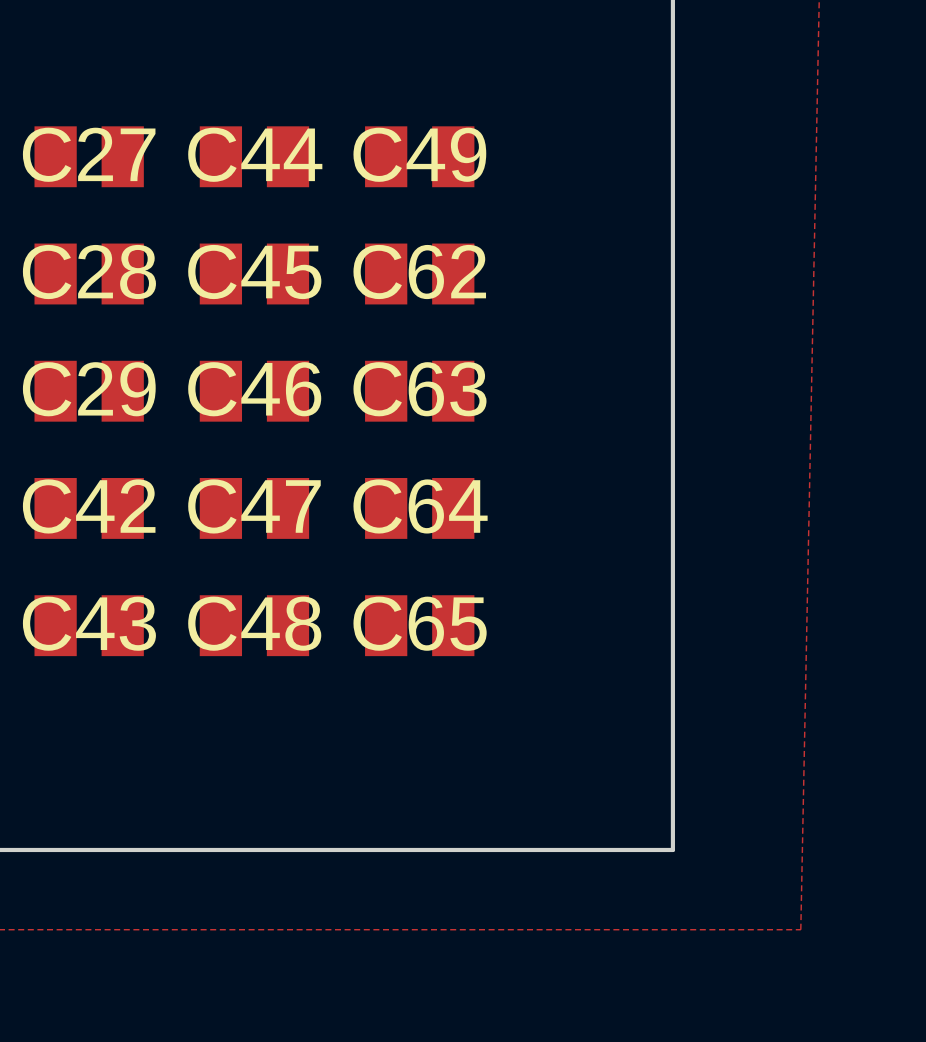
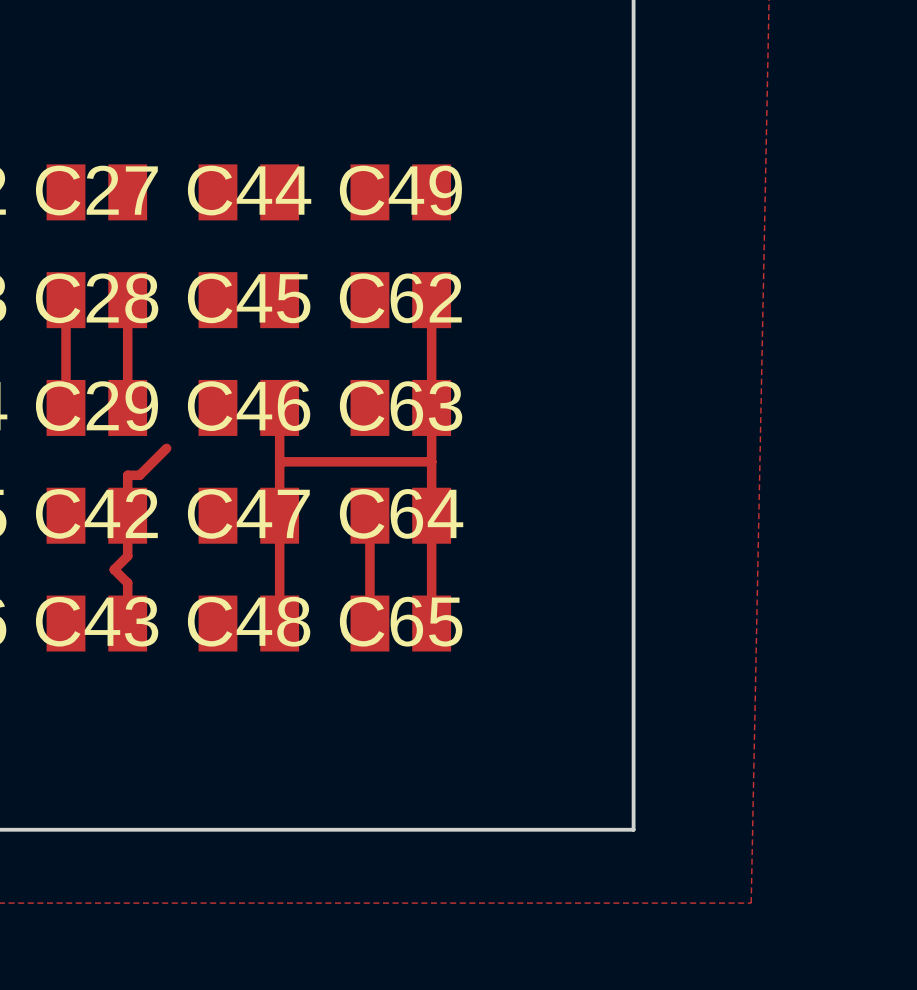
track: none -> (66, 300) (66, 407)
track: none -> (127, 300) (127, 407)
track: none -> (431, 300) (431, 623)
track: none -> (279, 407) (279, 623)
track: none -> (166, 448) (139, 475) (127, 475) (127, 556) (114, 569) (127, 583) (127, 623)
track: none -> (279, 461) (431, 461)
track: none -> (369, 515) (369, 623)

